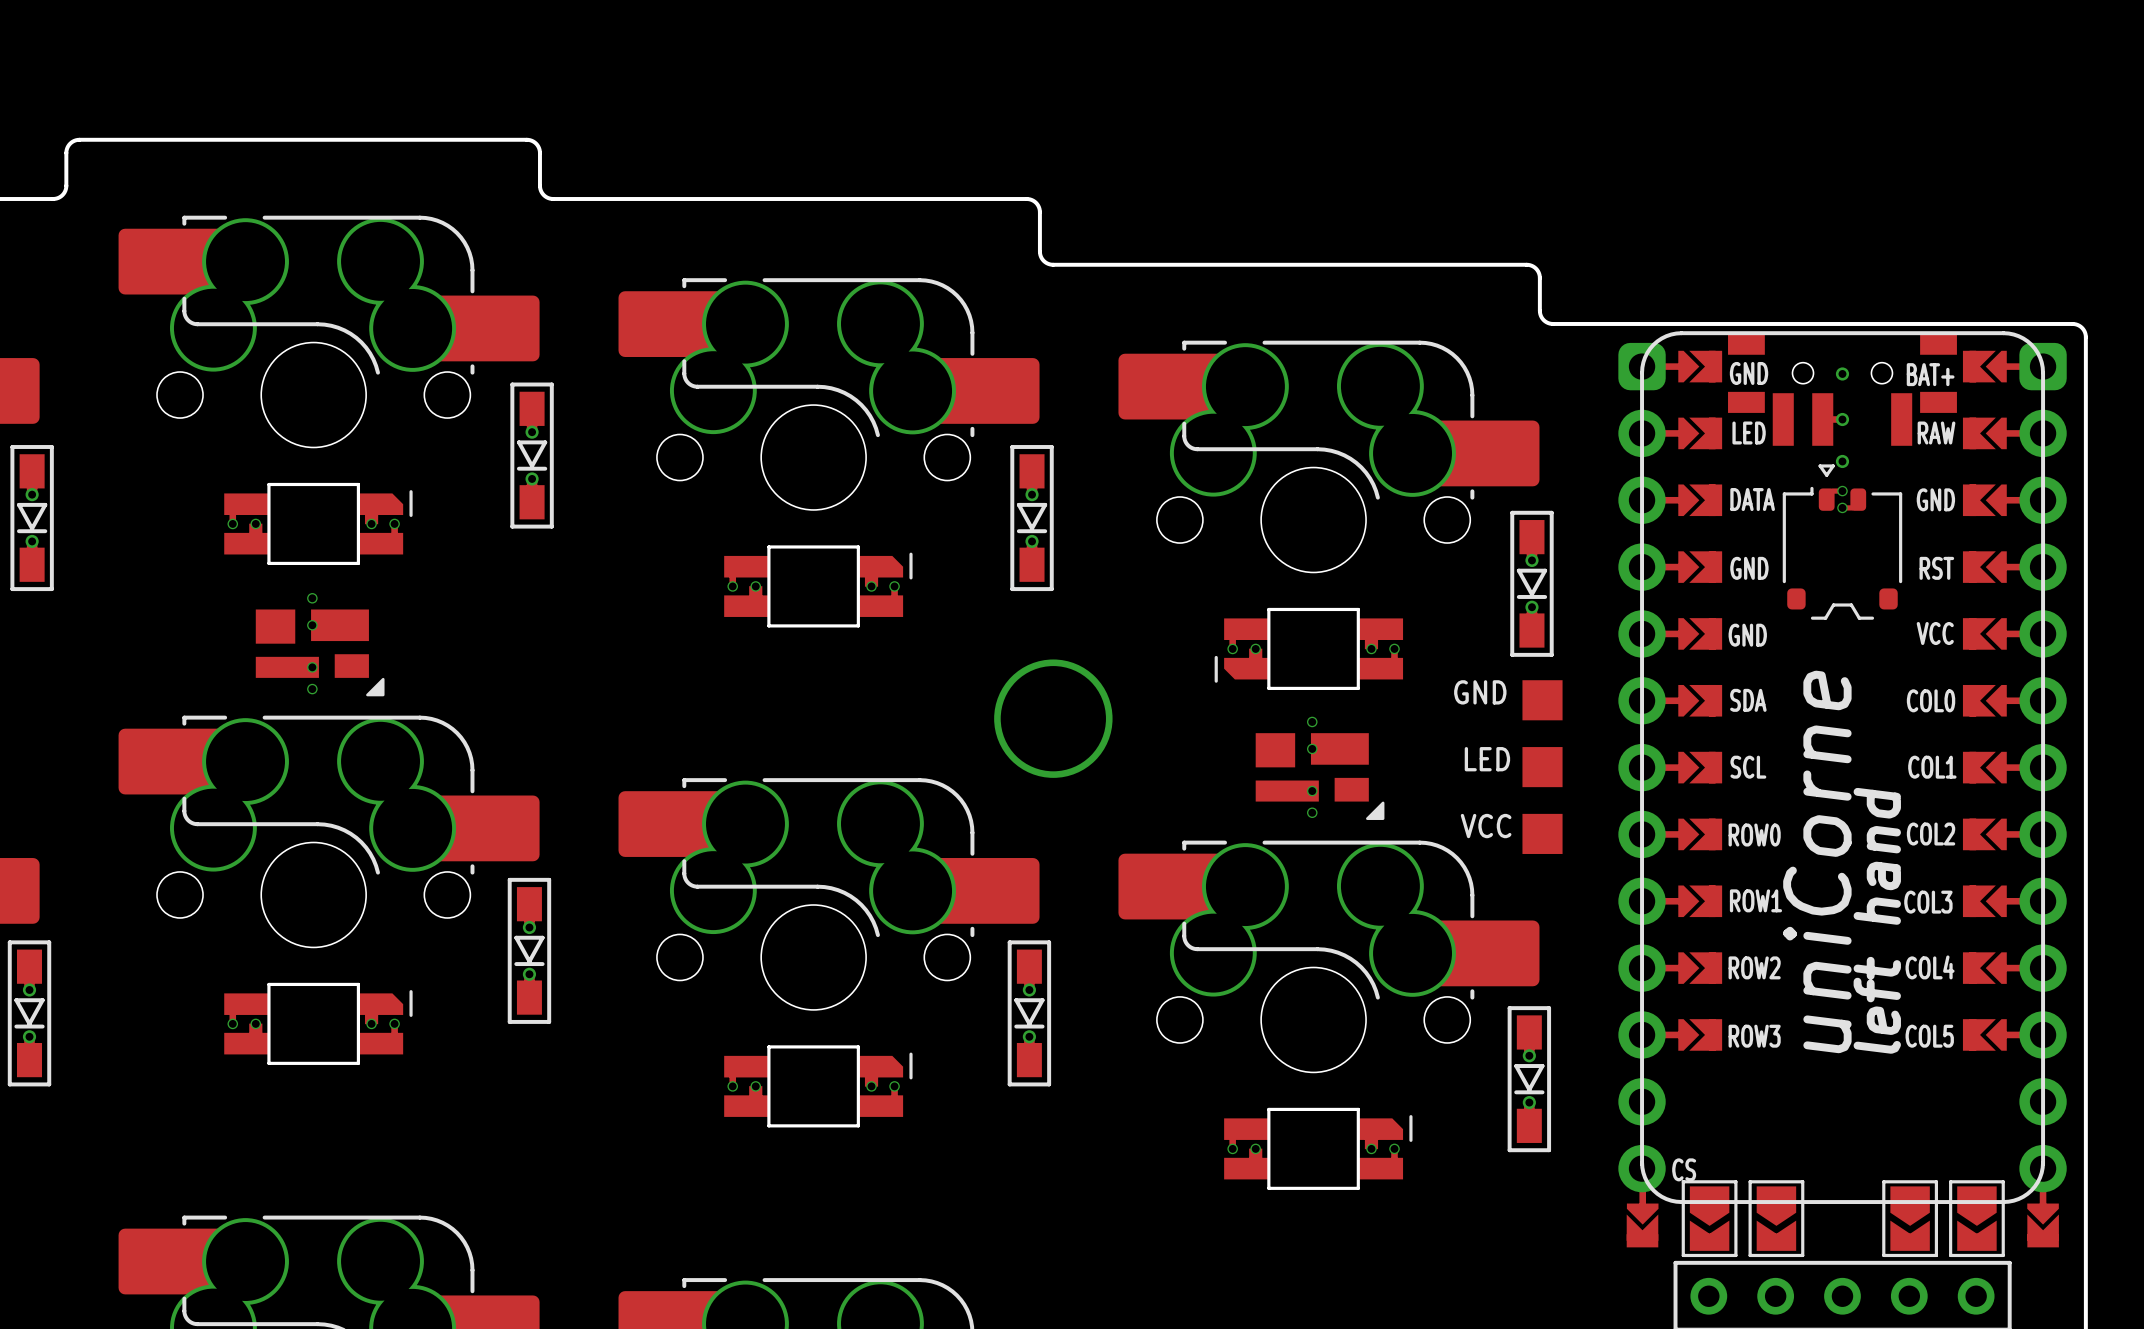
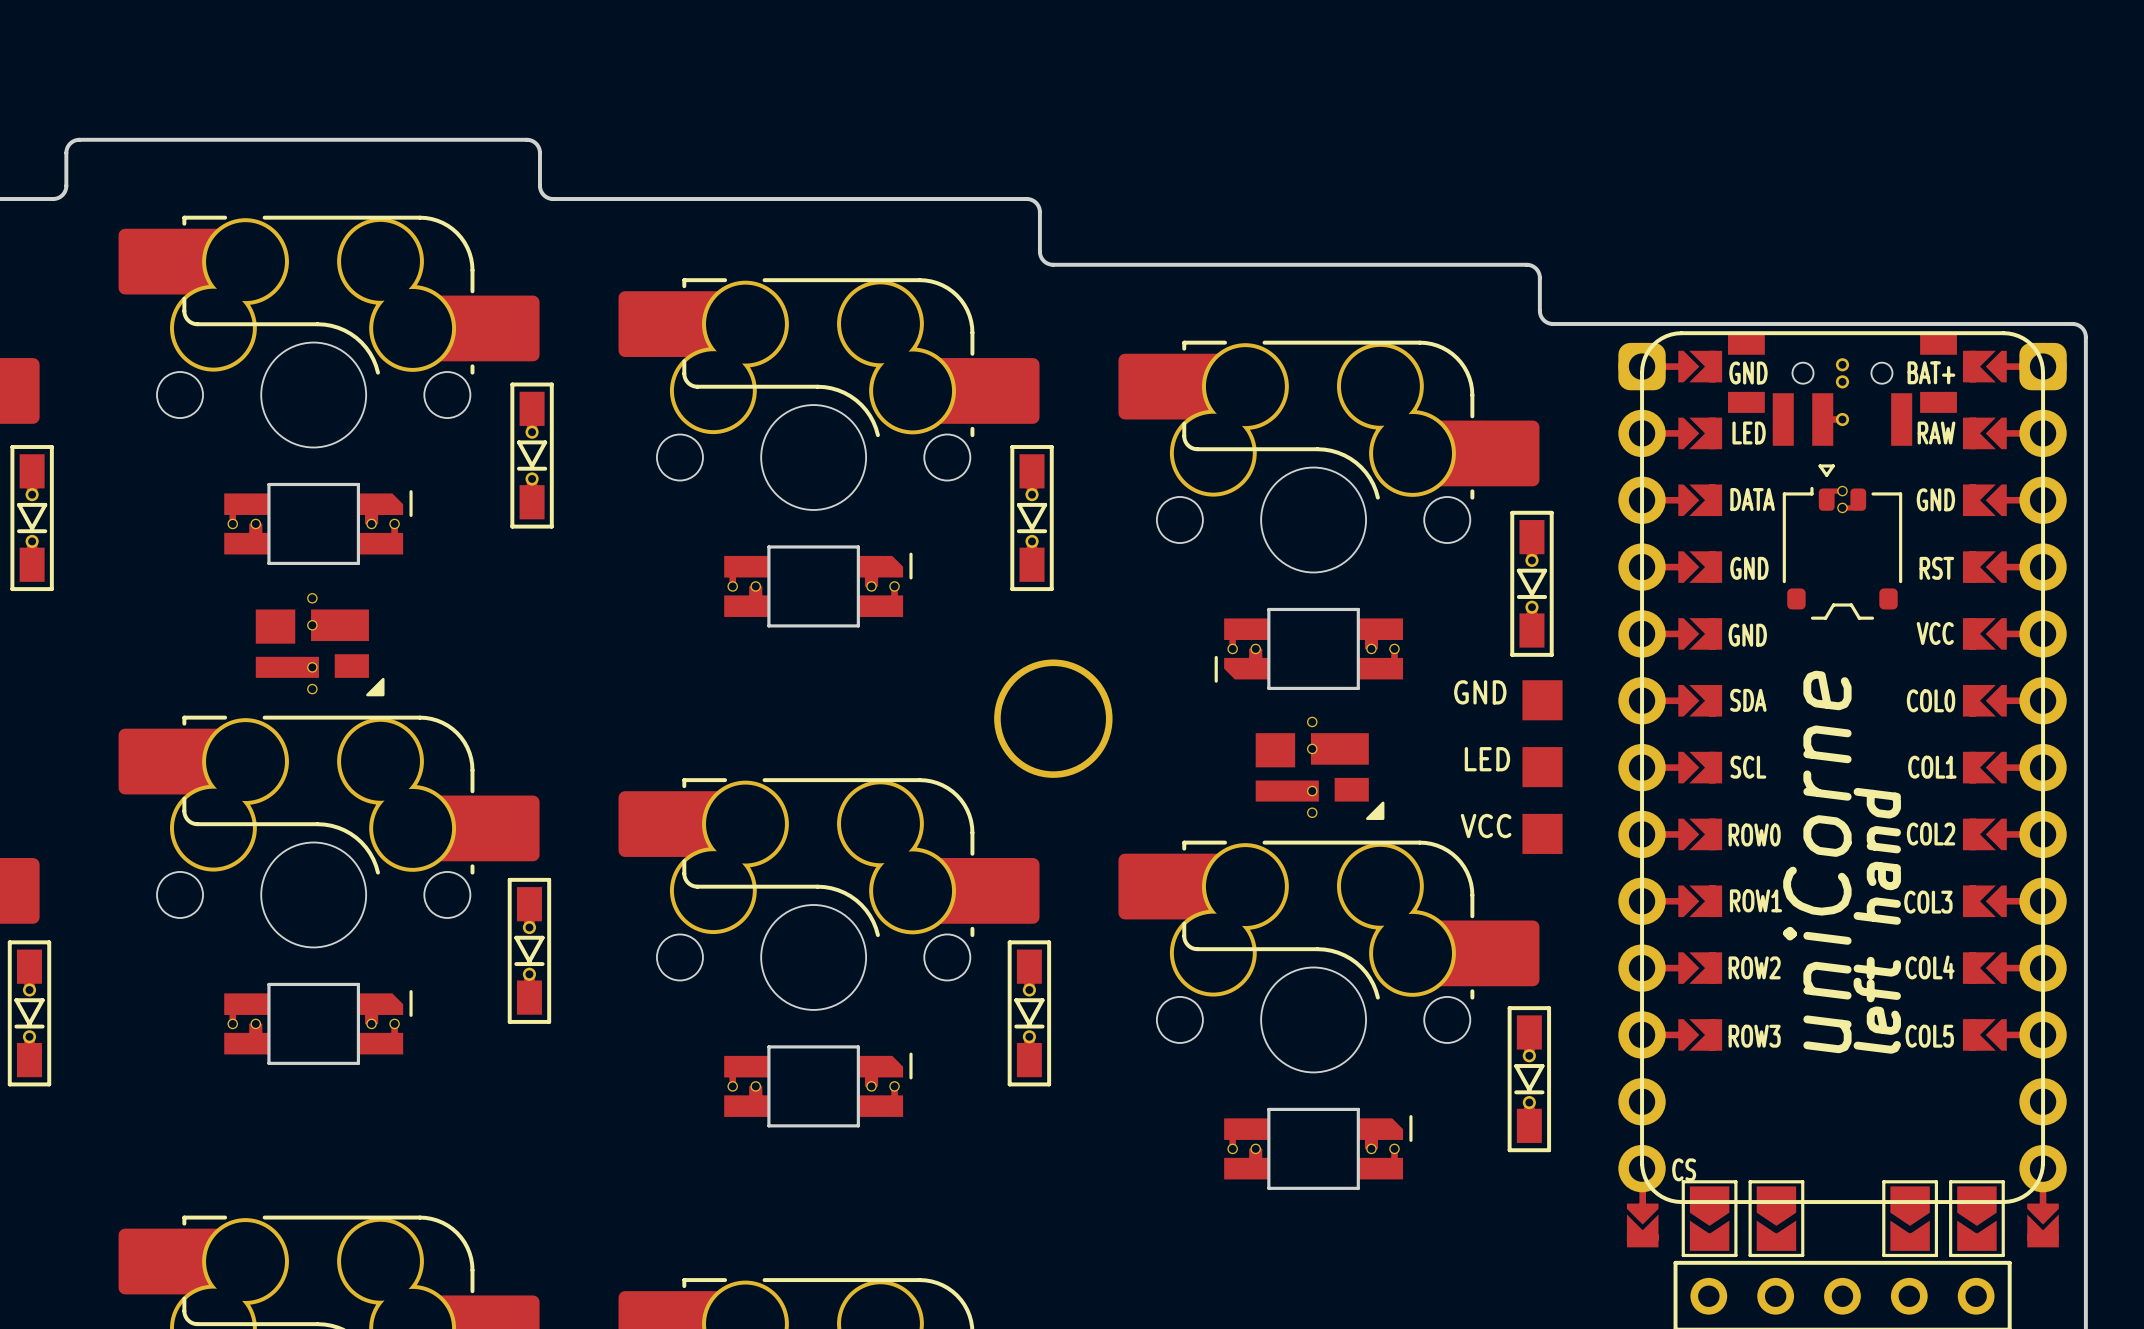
part footprint: [1618, 331, 2067, 1248] -> [1618, 331, 2067, 1248]
part footprint: [1728, 333, 1957, 469] -> [1728, 333, 1957, 446]

